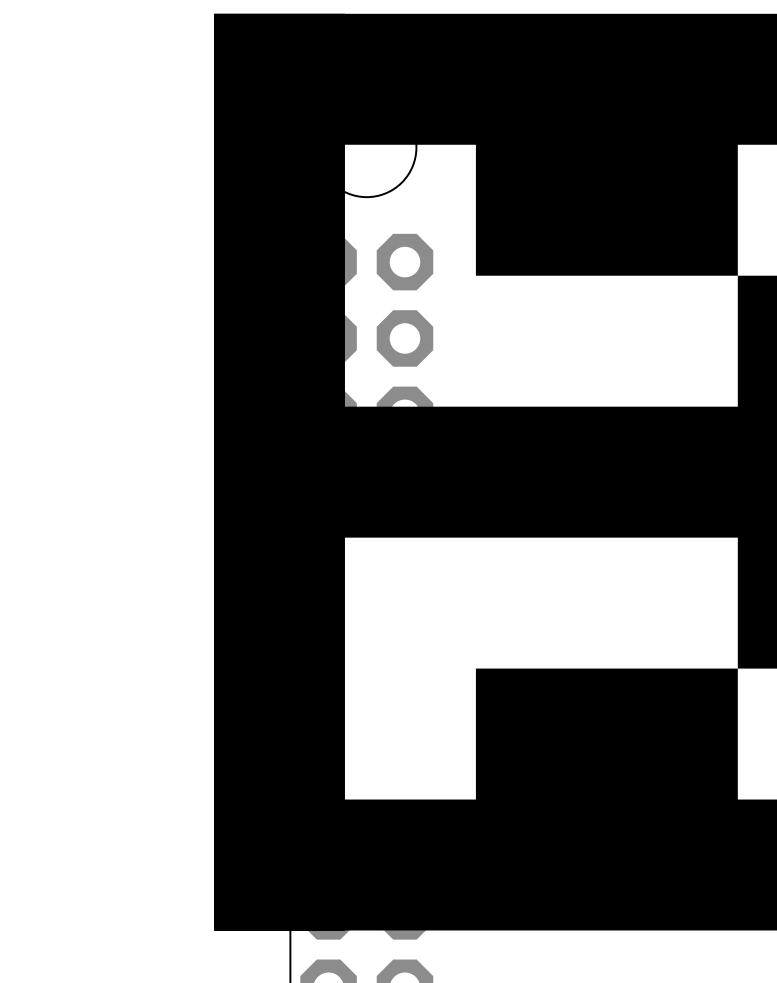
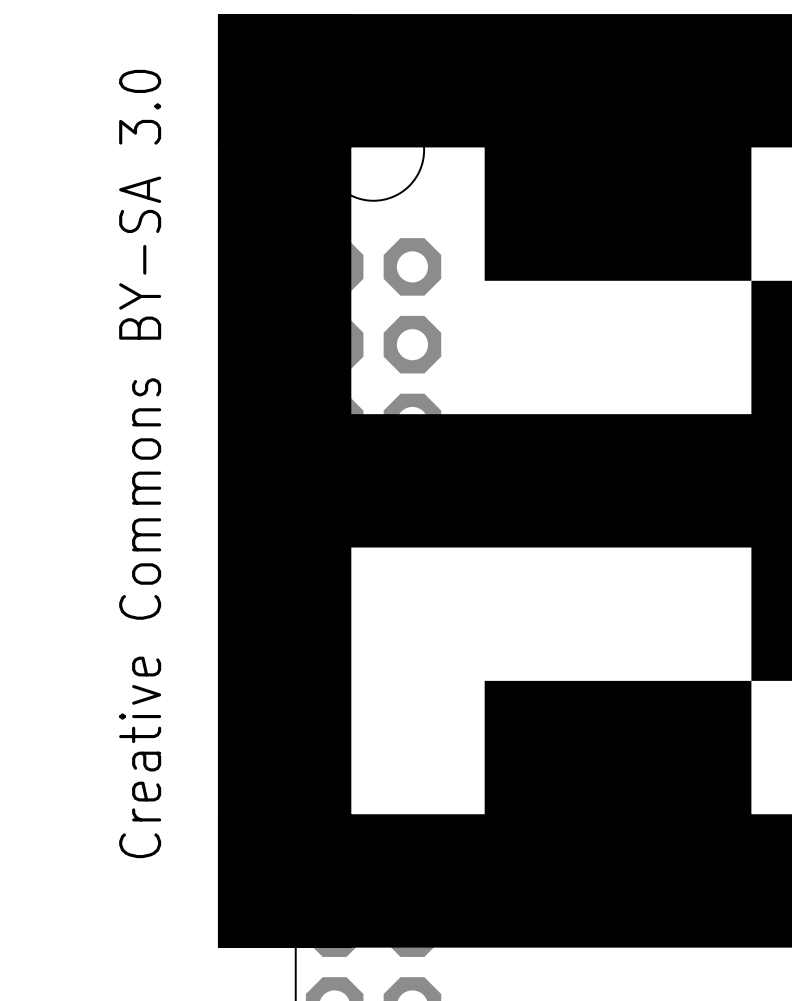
text: none -> Creative Commons BY-SA 3.0 (140, 463)

